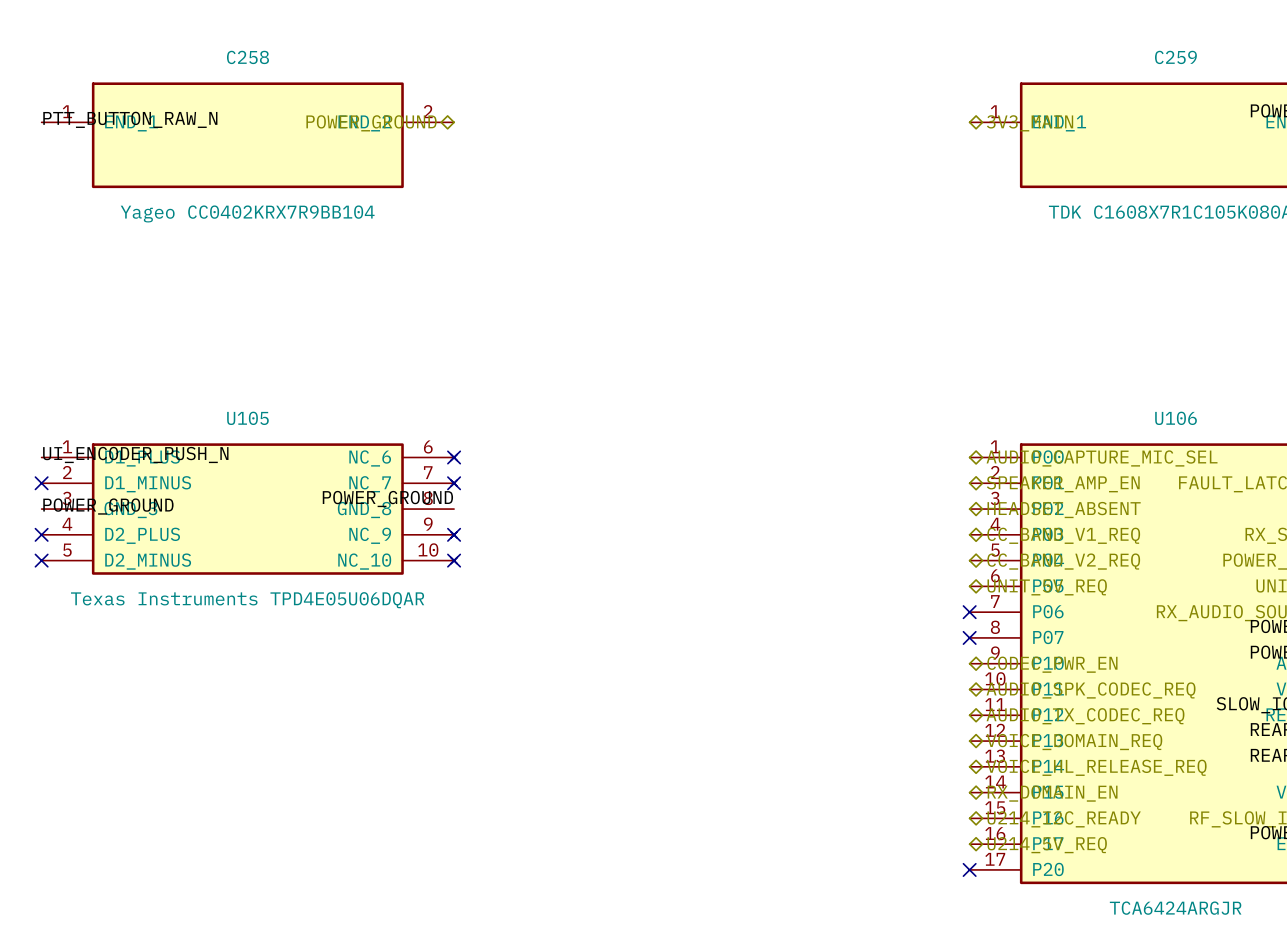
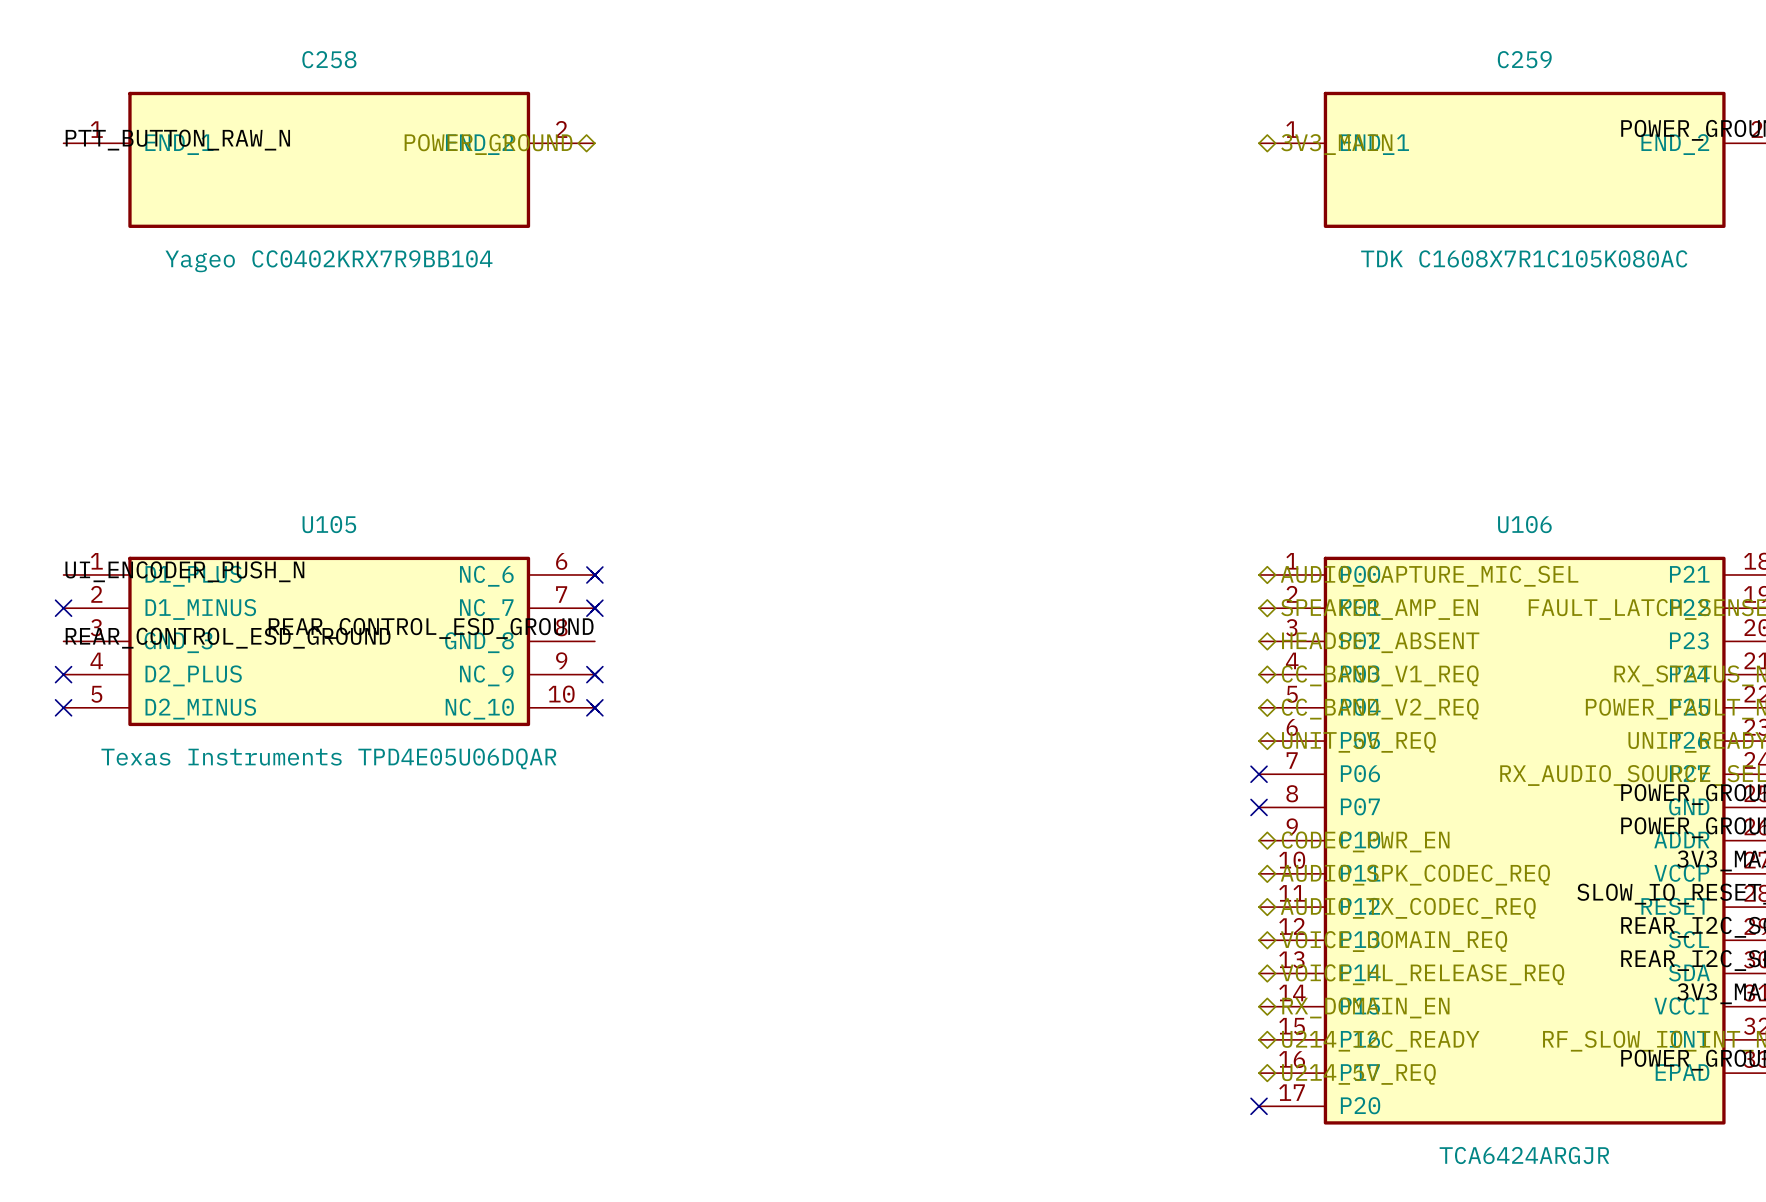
label: POWER_GROUND (387, 498) -> REAR_CONTROL_ESD_GROUND (431, 628)
label: POWER_GROUND (108, 506) -> REAR_CONTROL_ESD_GROUND (228, 638)

